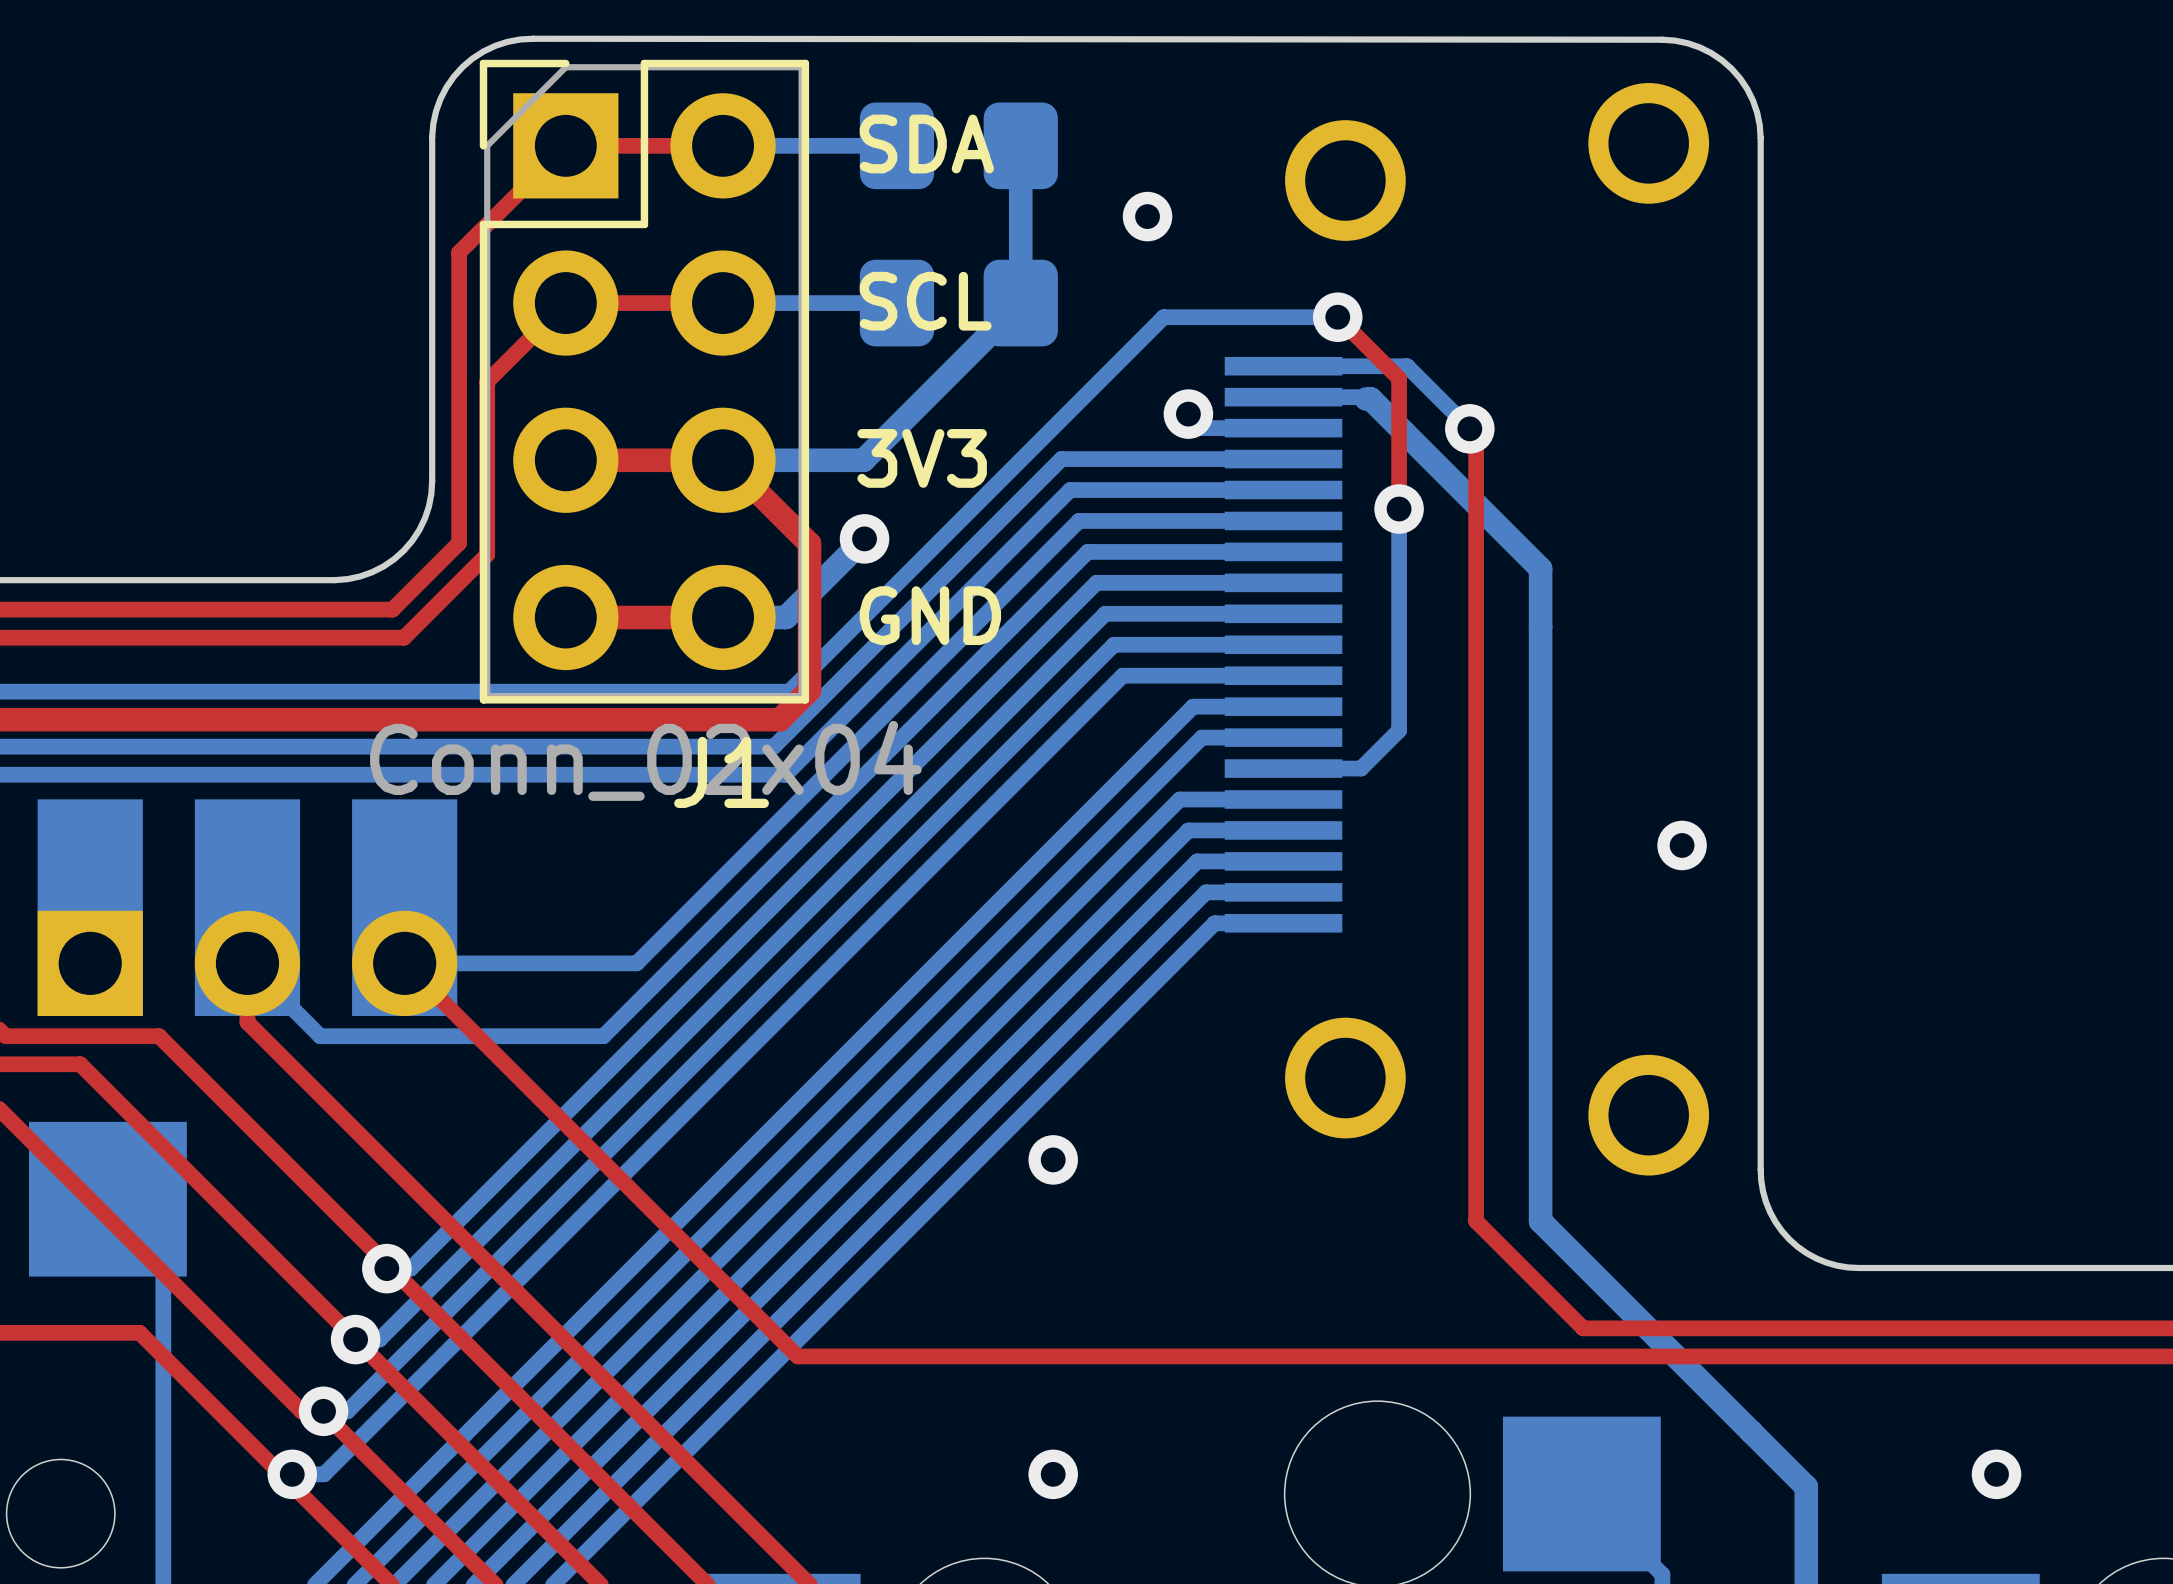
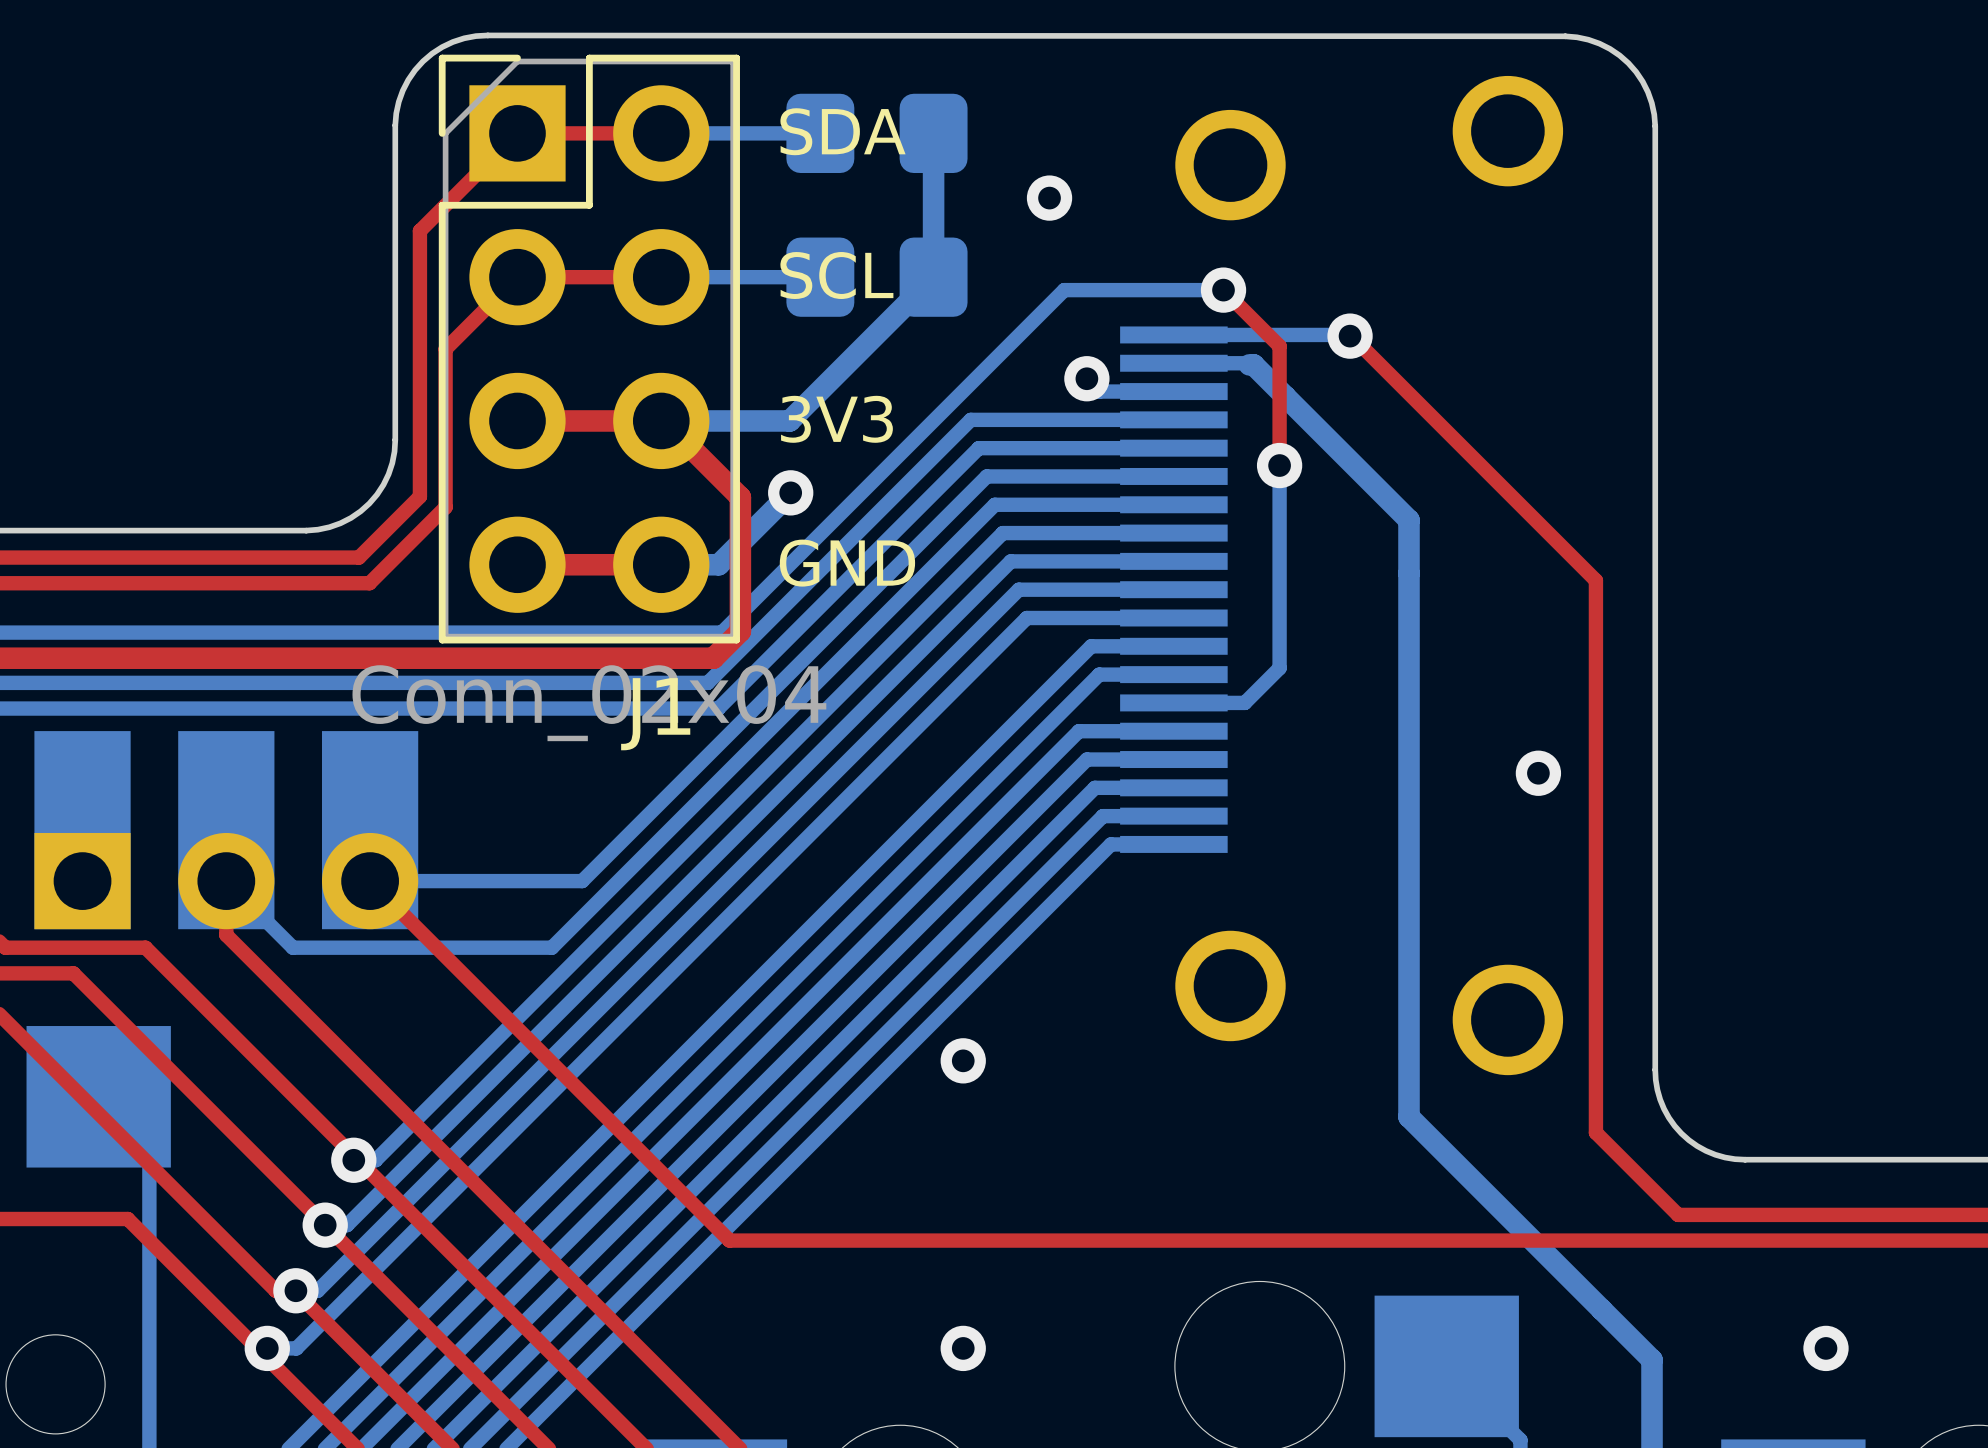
board edge: (533, 38) (1662, 39) (1675, 40) (1699, 47) (1722, 60) (1731, 68) (1740, 78) (1752, 100) (1757, 112) (1760, 137) (1761, 1180) (1766, 1202) (1775, 1222) (1789, 1239) (1806, 1253) (1826, 1262) (1847, 1267) (1908, 1267) -> (487, 35) (1565, 36) (1599, 43) (1628, 63) (1647, 92) (1655, 126) (1655, 1079) (1664, 1108) (1681, 1133) (1706, 1150) (1725, 1157) (1745, 1159)
bottom track: (1407, 366) (1469, 428) -> (1287, 334) (1350, 336)
top track: (1469, 428) (1476, 435) (1476, 1221) (1583, 1328) (1834, 1328) -> (1350, 336) (1595, 580) (1595, 1132) (1678, 1214)
via position: (1469, 428) -> (1350, 336)

